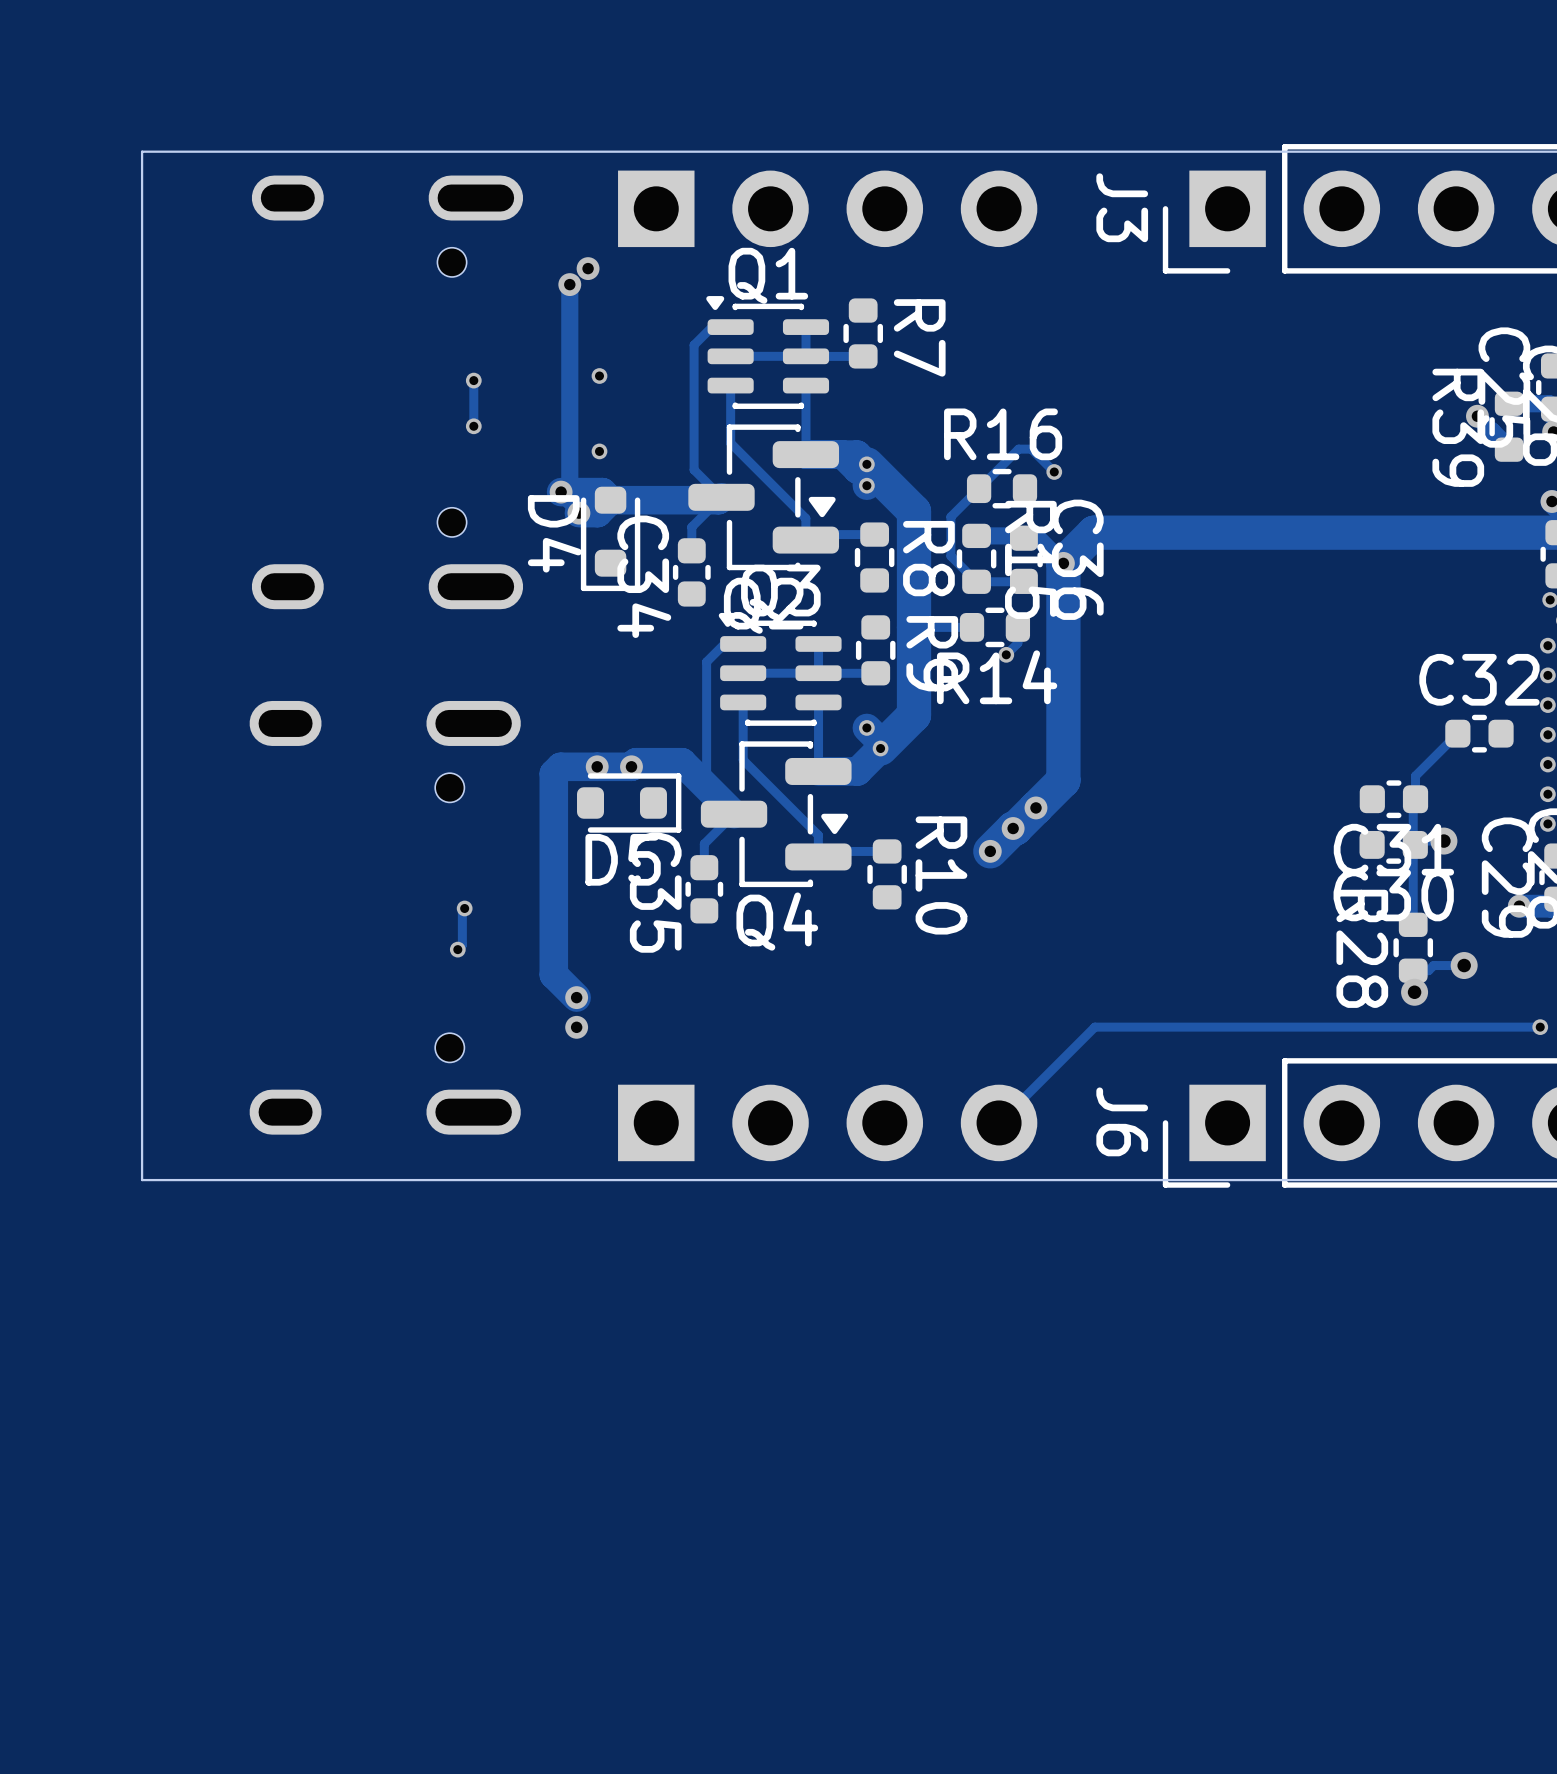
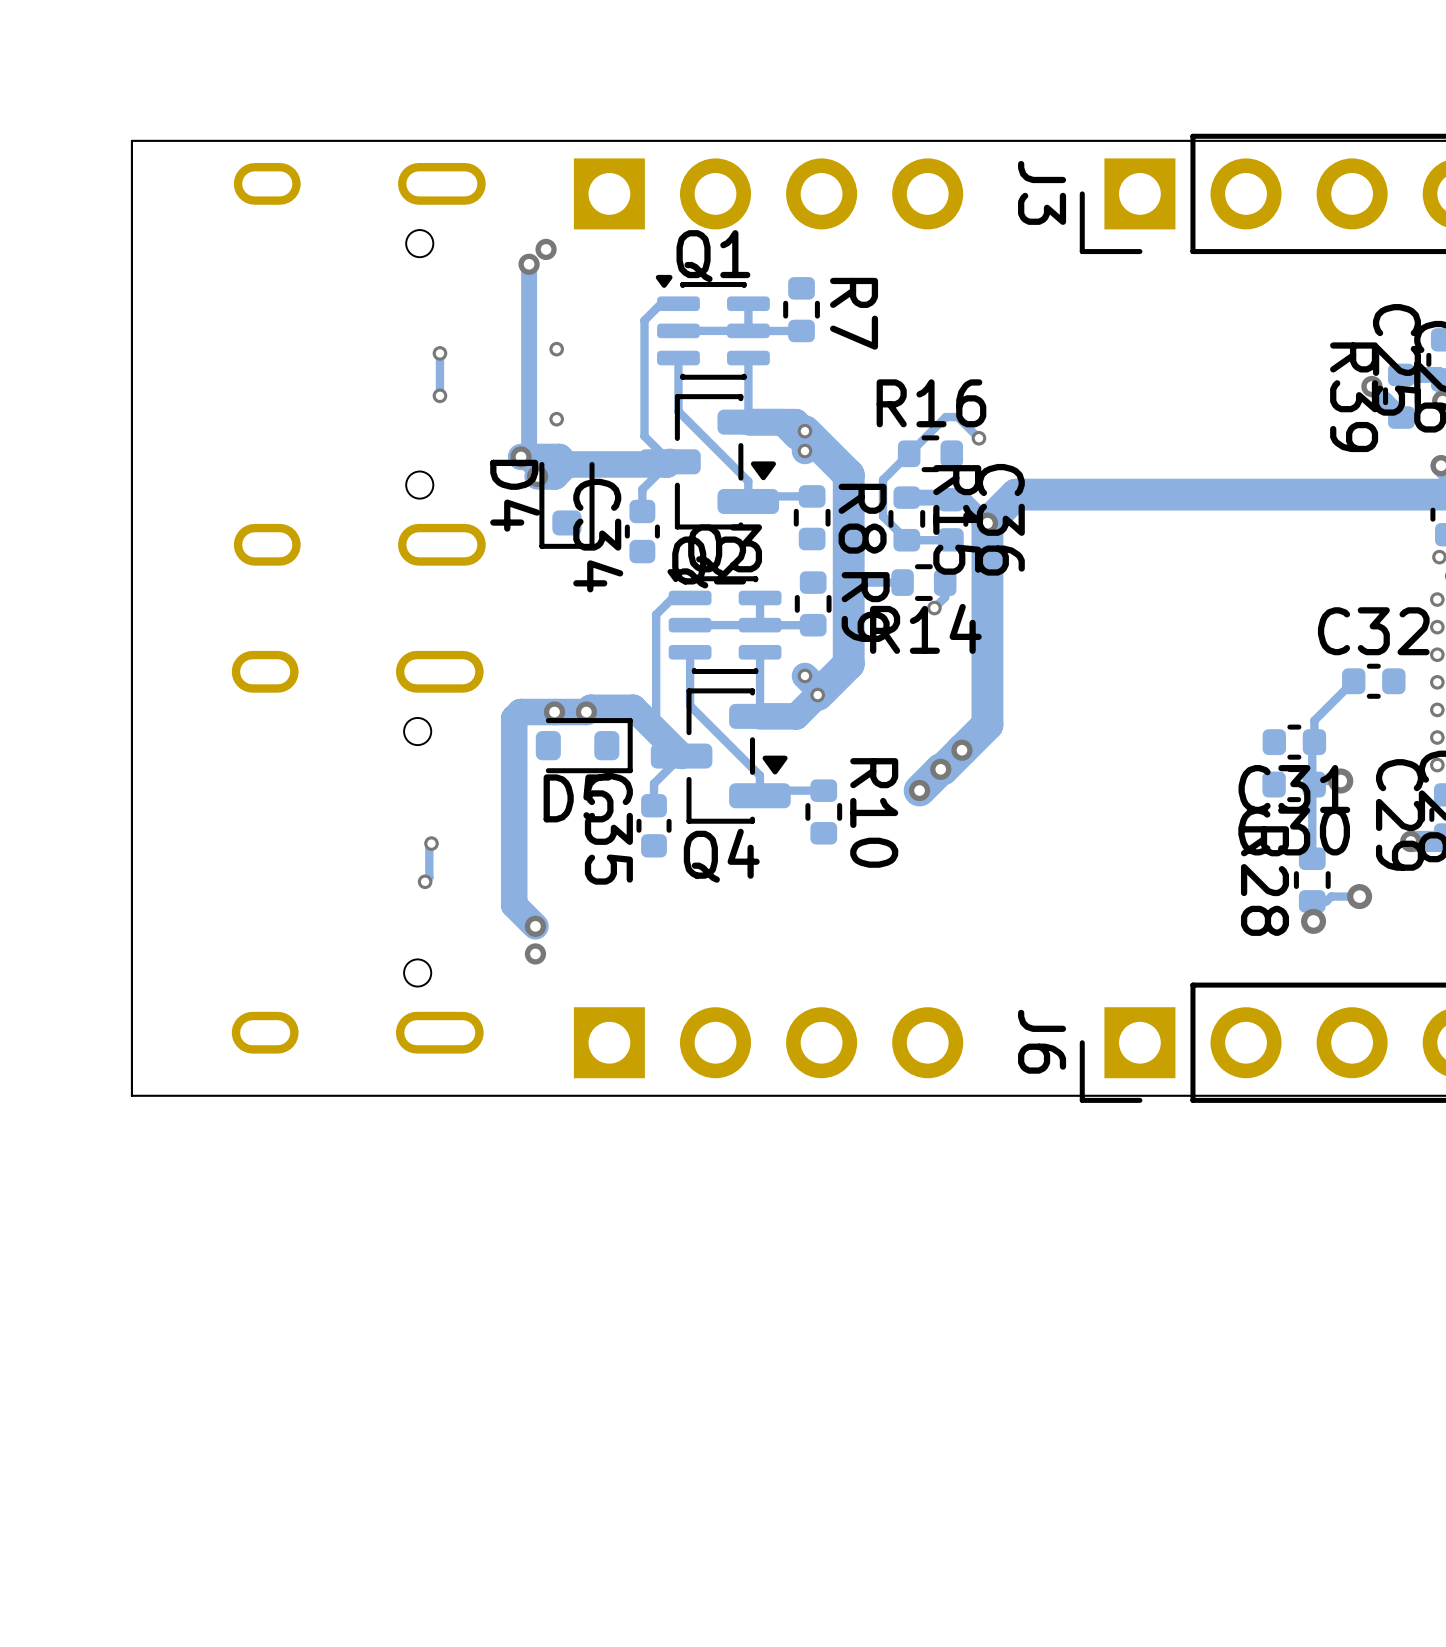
track: (1540, 1027) (1094, 1027) (999, 1122) -> none
via: (1540, 1027) -> none

